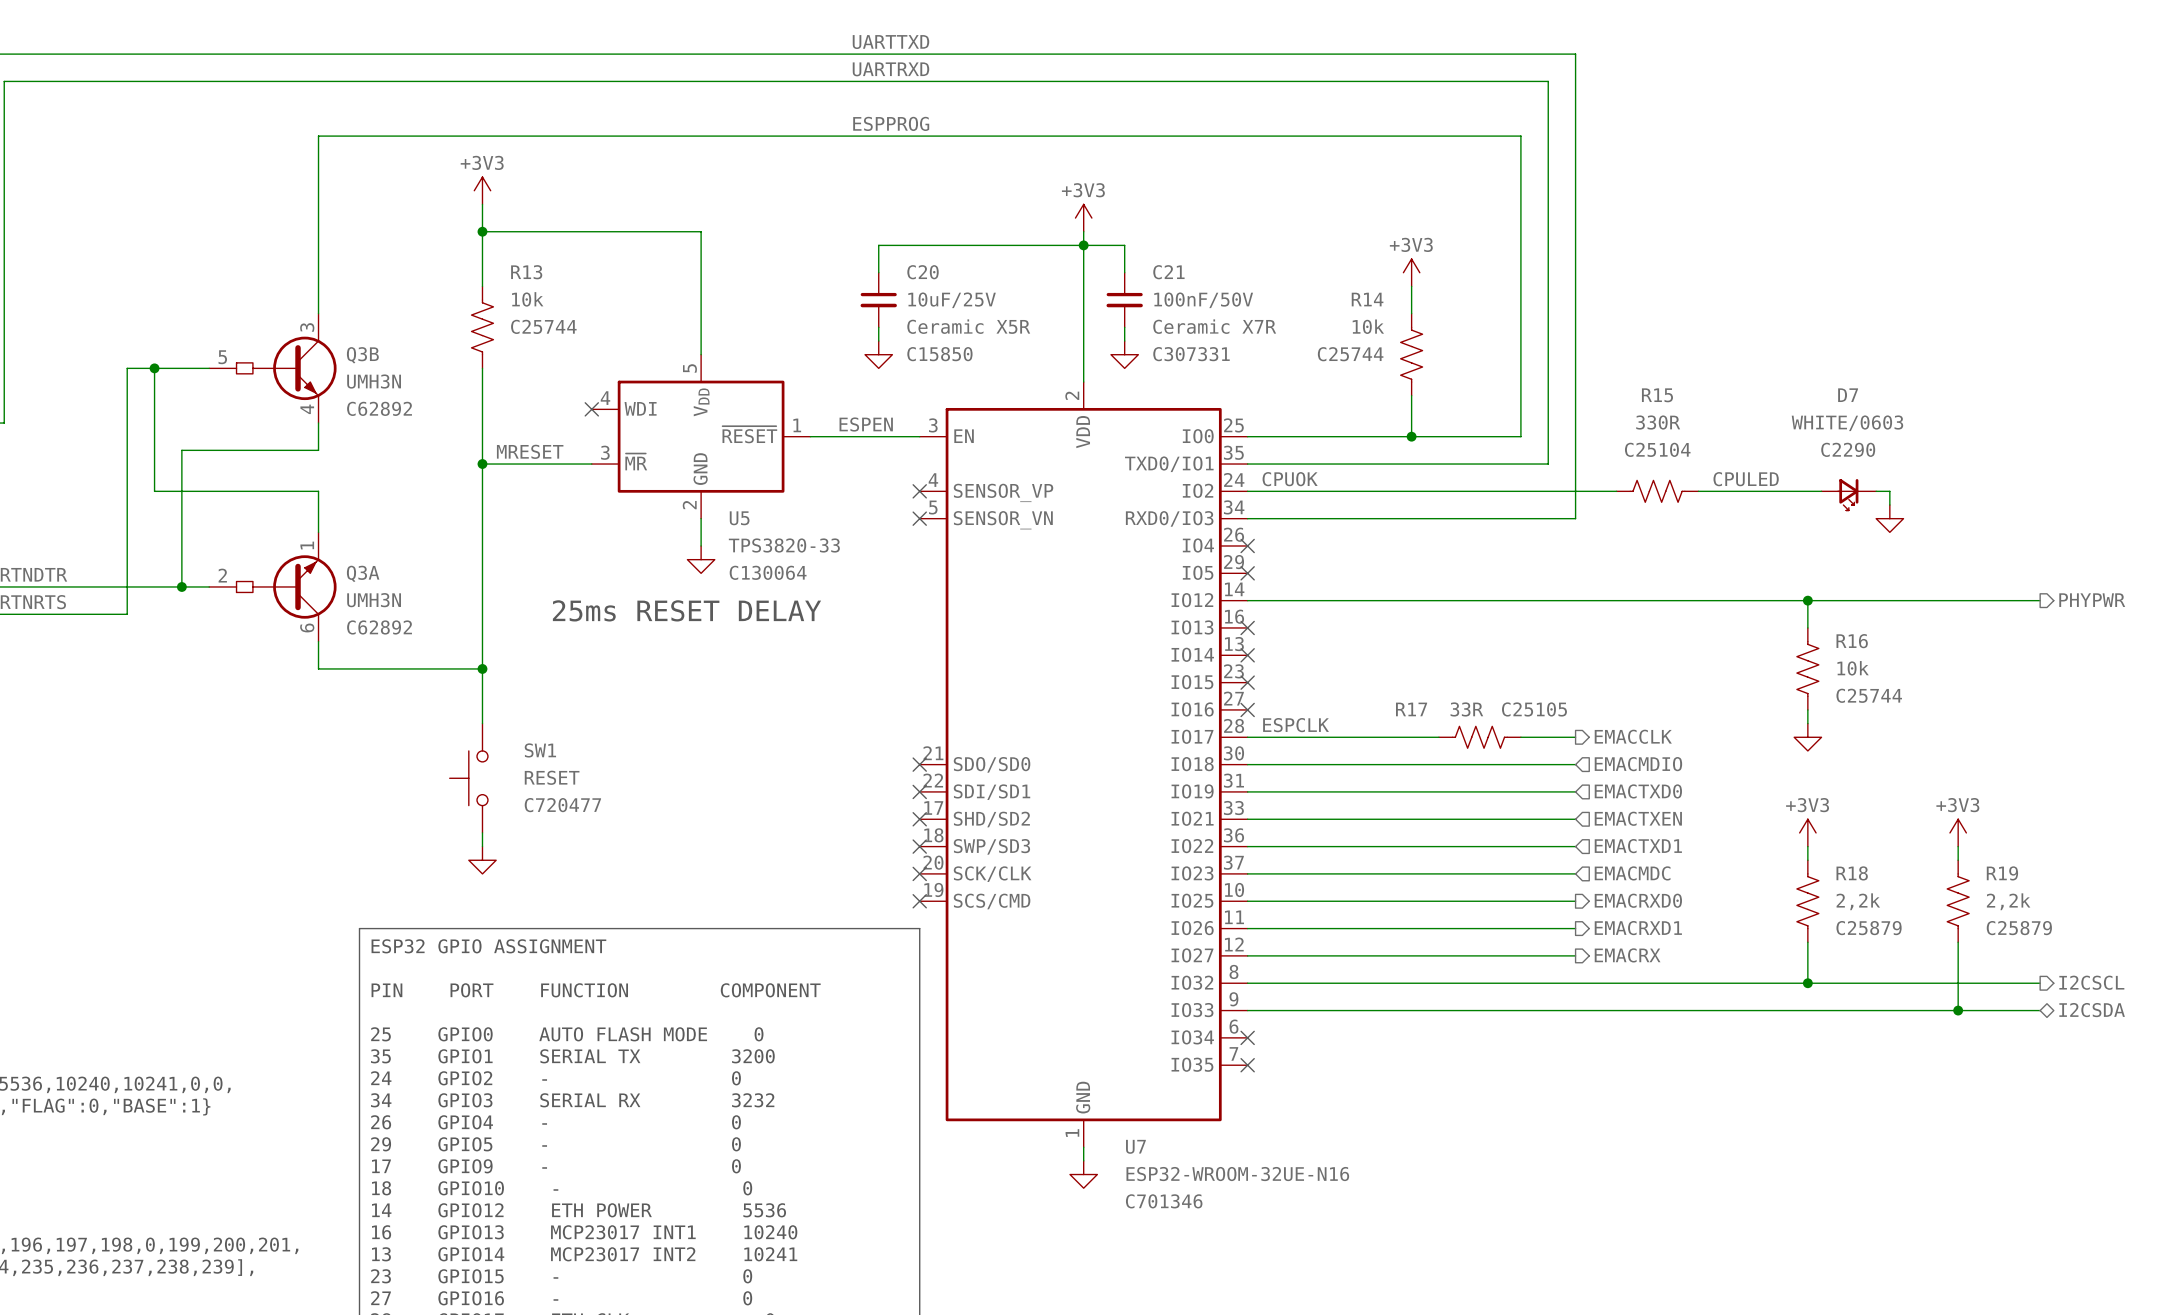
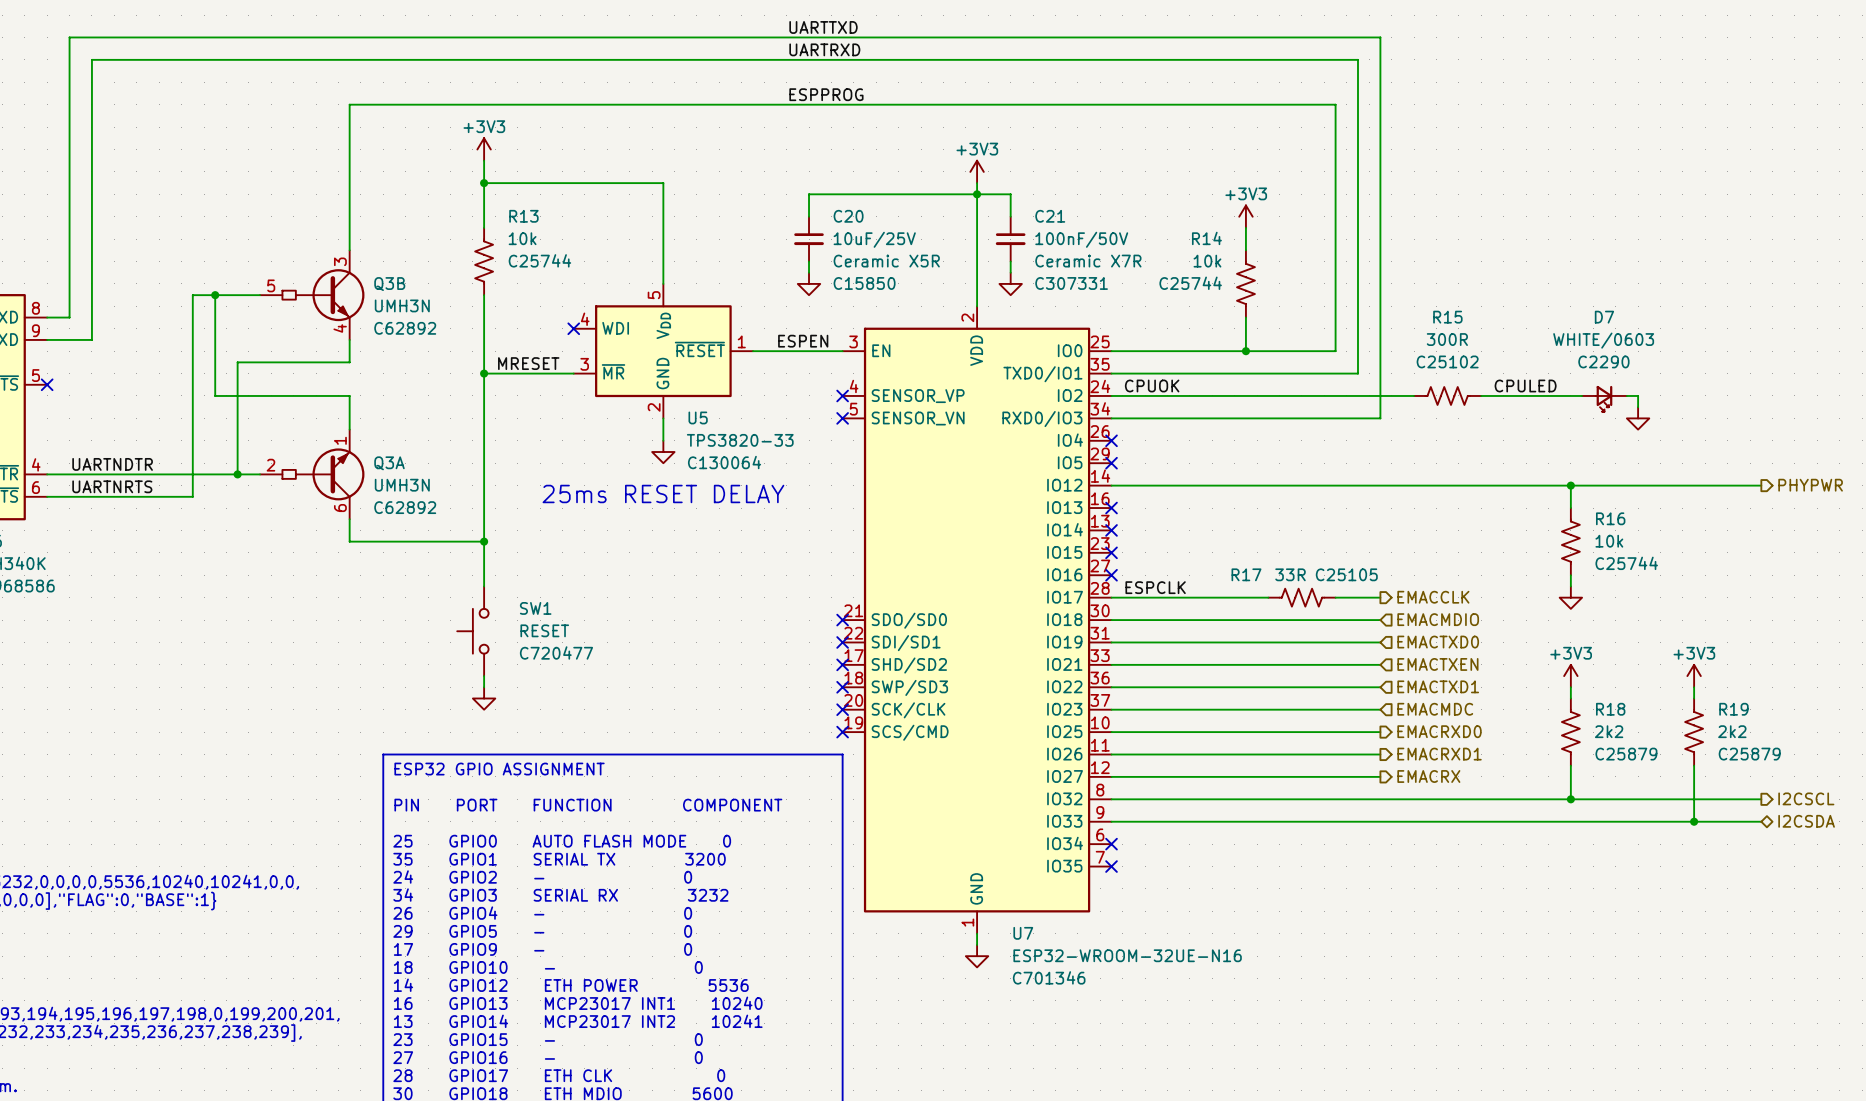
R15 value: 330R (1658, 422) -> 300R (1447, 339)
R15 text: C25104 (1657, 449) -> C25102 (1447, 361)
R18 value: 2,2k (1858, 901) -> 2k2 (1609, 731)
R19 value: 2,2k (2008, 901) -> 2k2 (1732, 731)

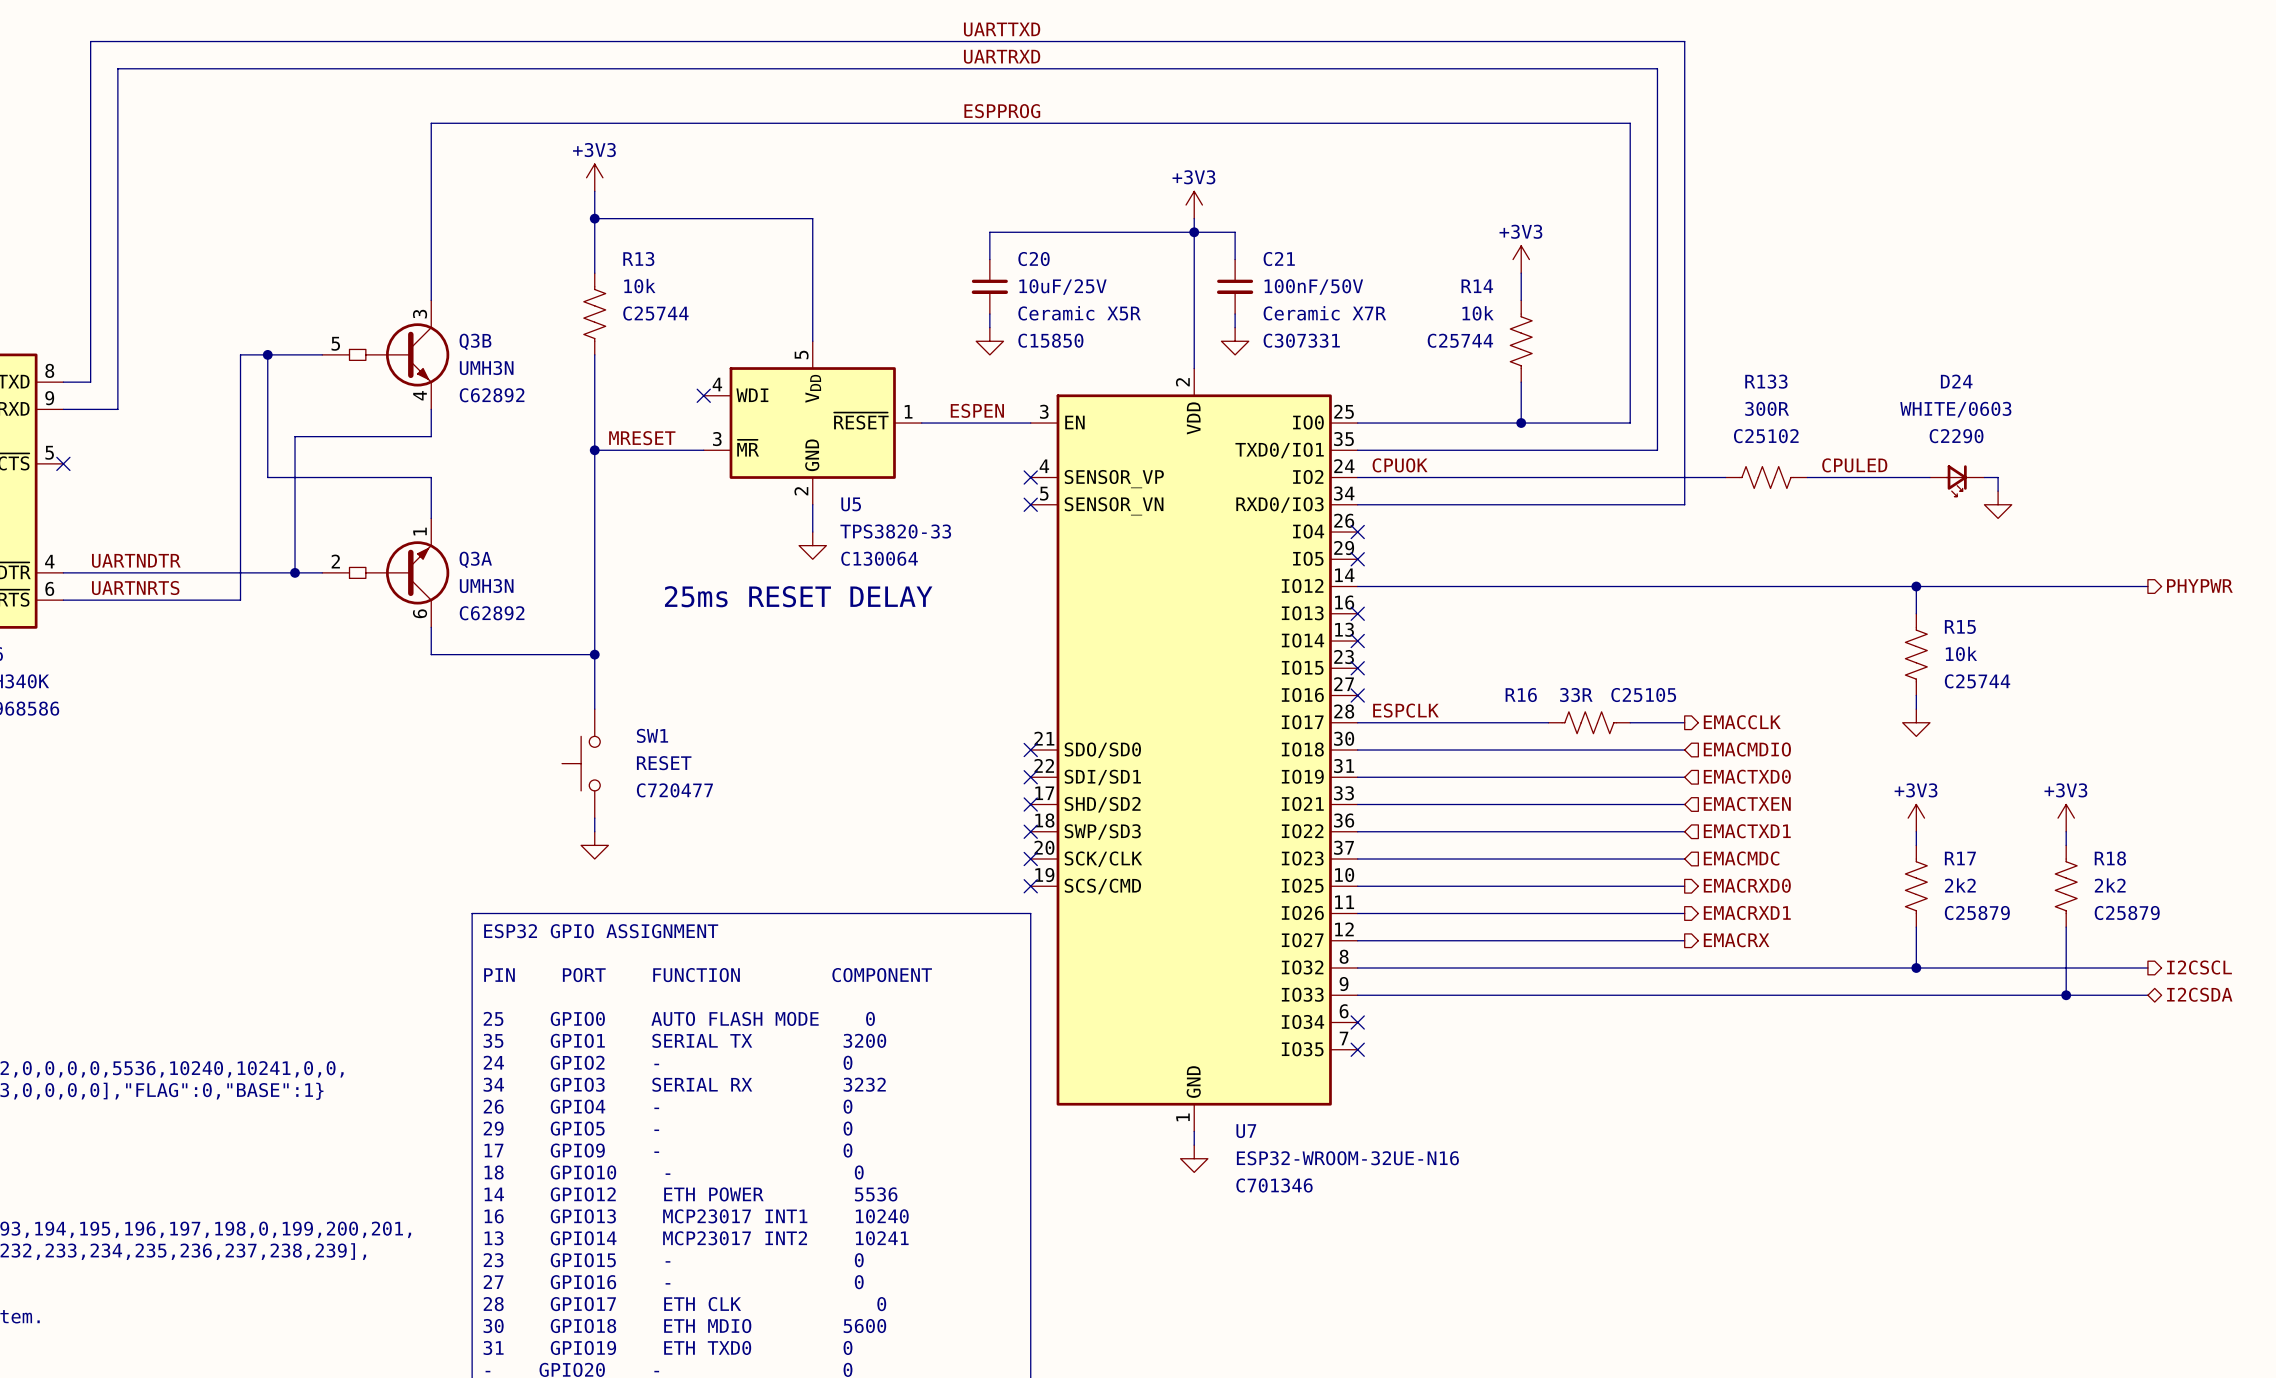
R15 name: R15 (1447, 317) -> R133 (1766, 381)
D7 name: D7 (1604, 317) -> D24 (1956, 381)
R16 name: R16 (1610, 518) -> R15 (1960, 627)
R17 name: R17 (1246, 574) -> R16 (1521, 695)
R18 name: R18 (1610, 709) -> R17 (1960, 858)
R19 name: R19 (1733, 709) -> R18 (2110, 858)

